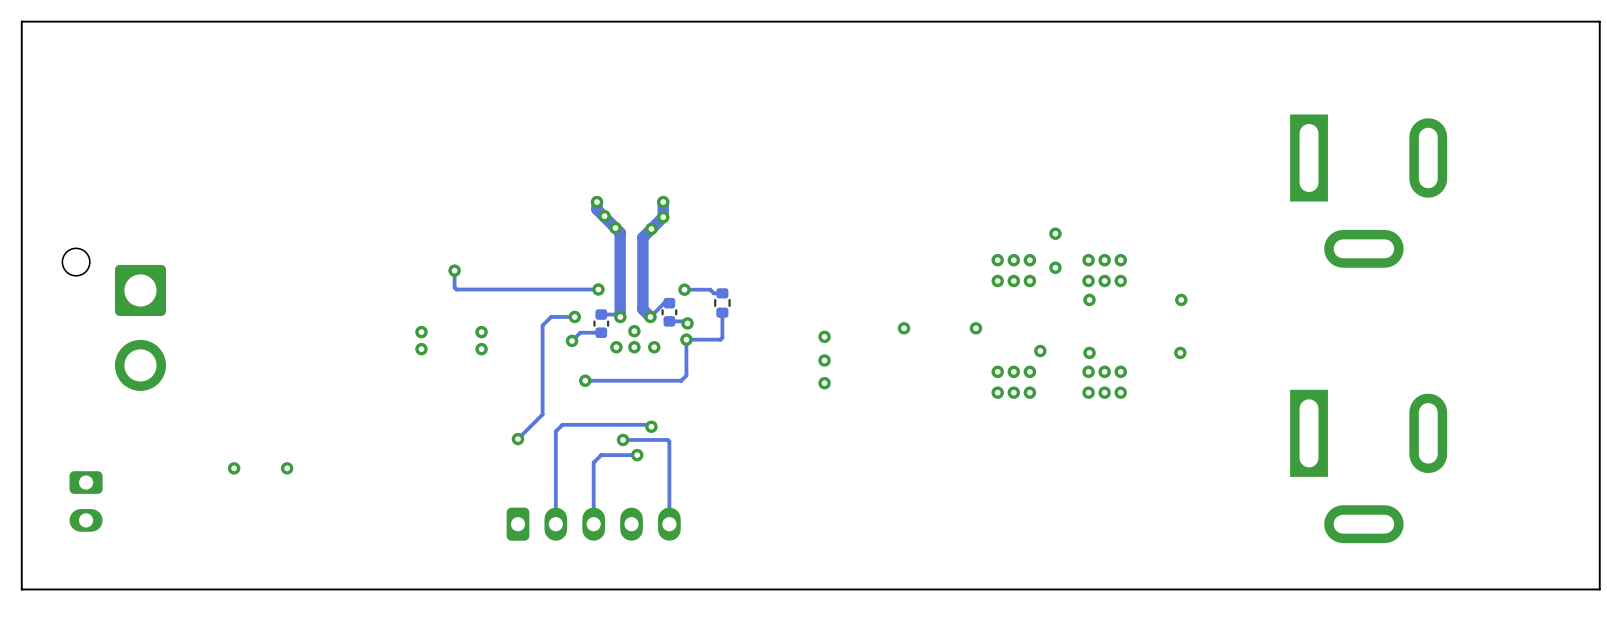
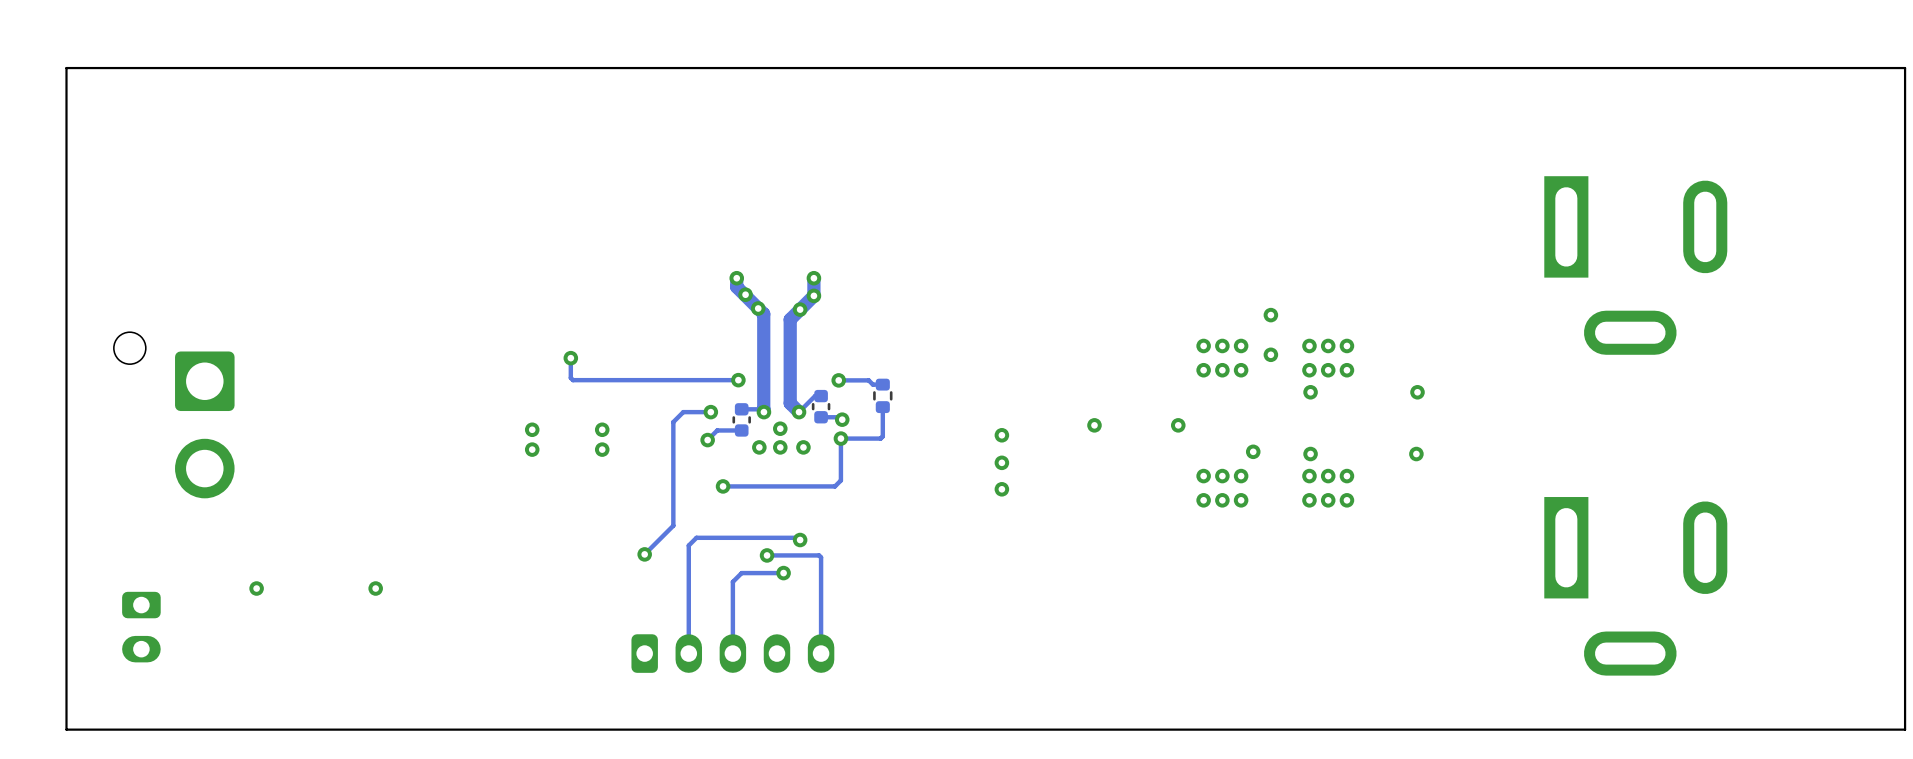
via position: (234, 468) -> (256, 588)

